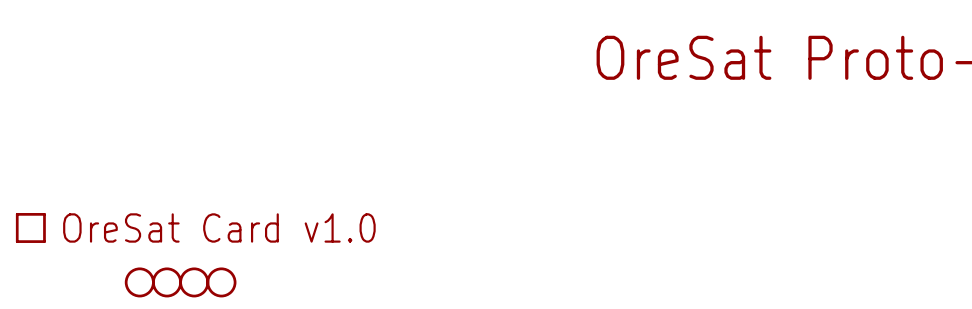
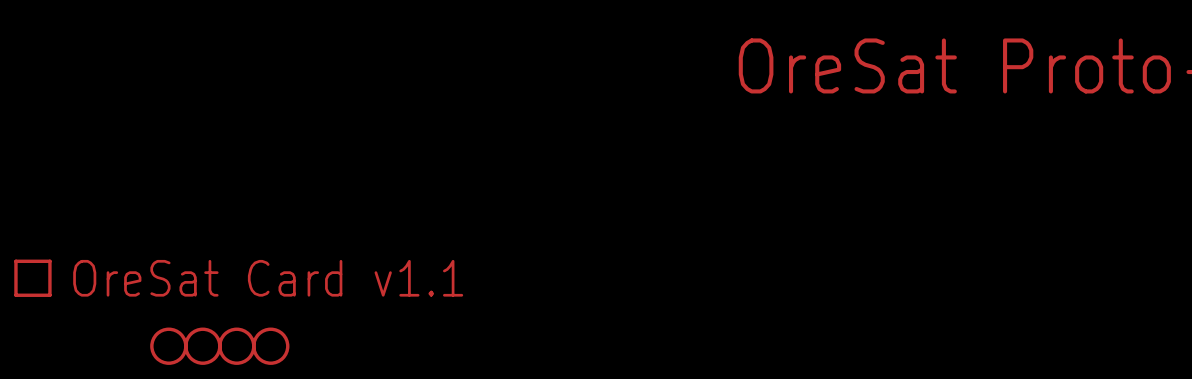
part text: OreSat Card v1.0 (219, 227) -> OreSat Card v1.1 (268, 278)

